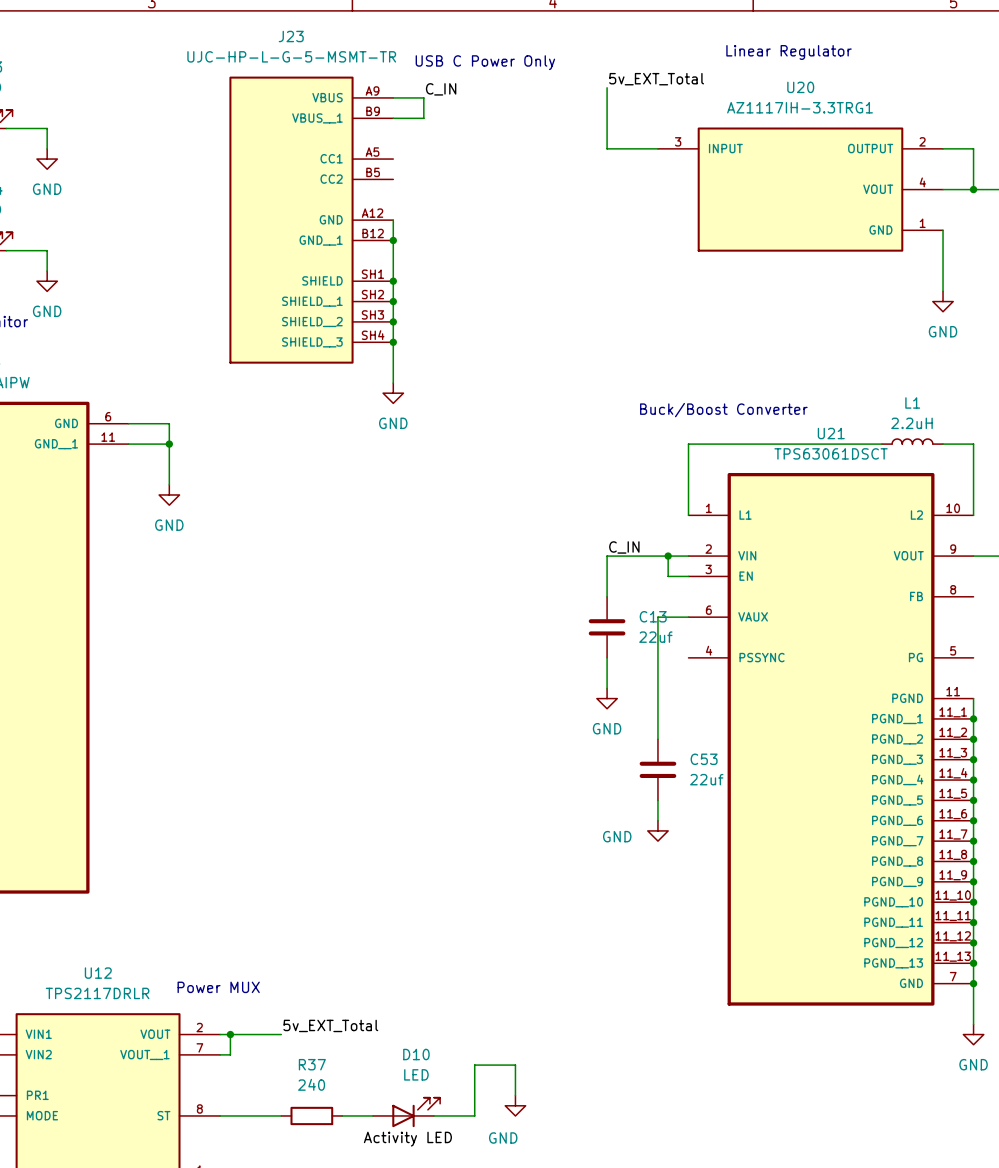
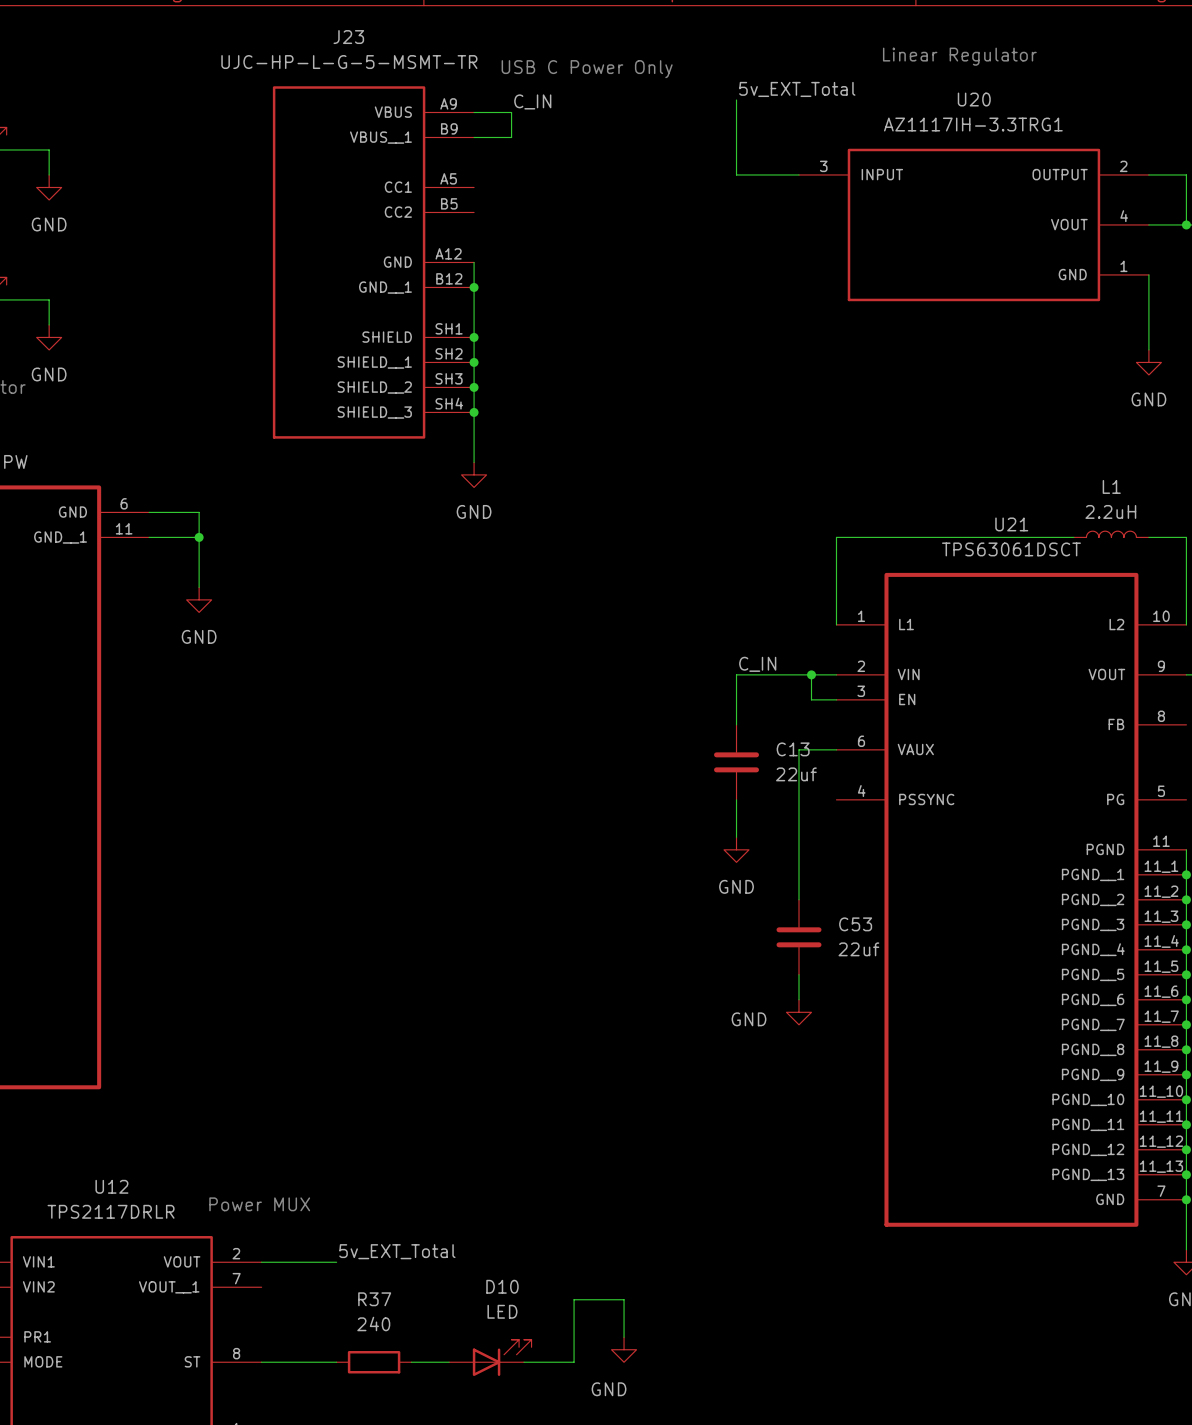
text: Buck/Boost Converter (723, 410) -> none
wire: (230, 1034) (230, 1054) (220, 1054) -> none
junction: (230, 1034) -> none
label: Activity LED (407, 1139) -> none

